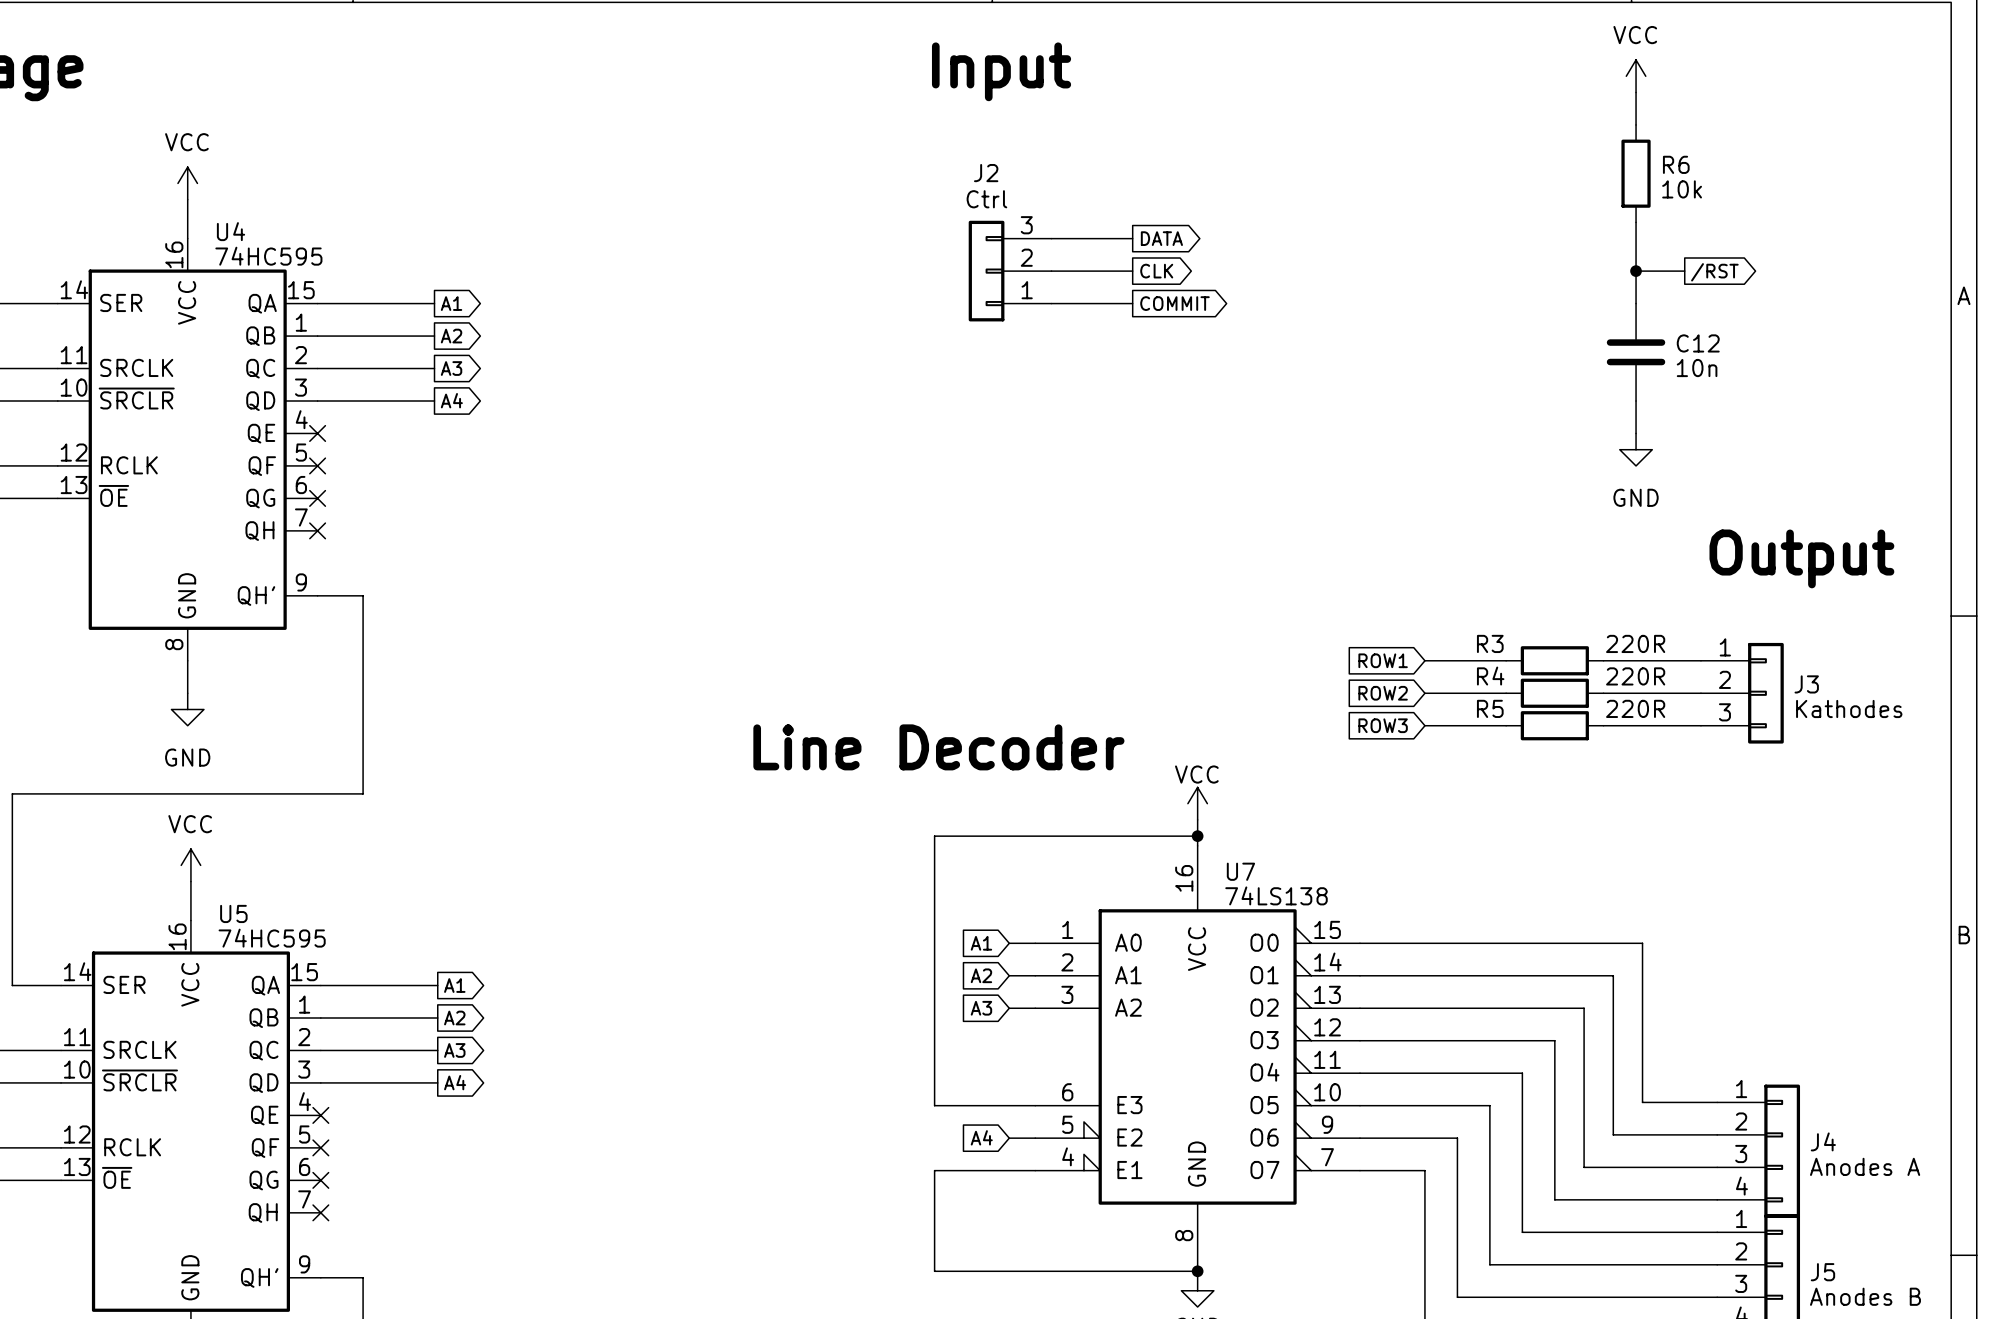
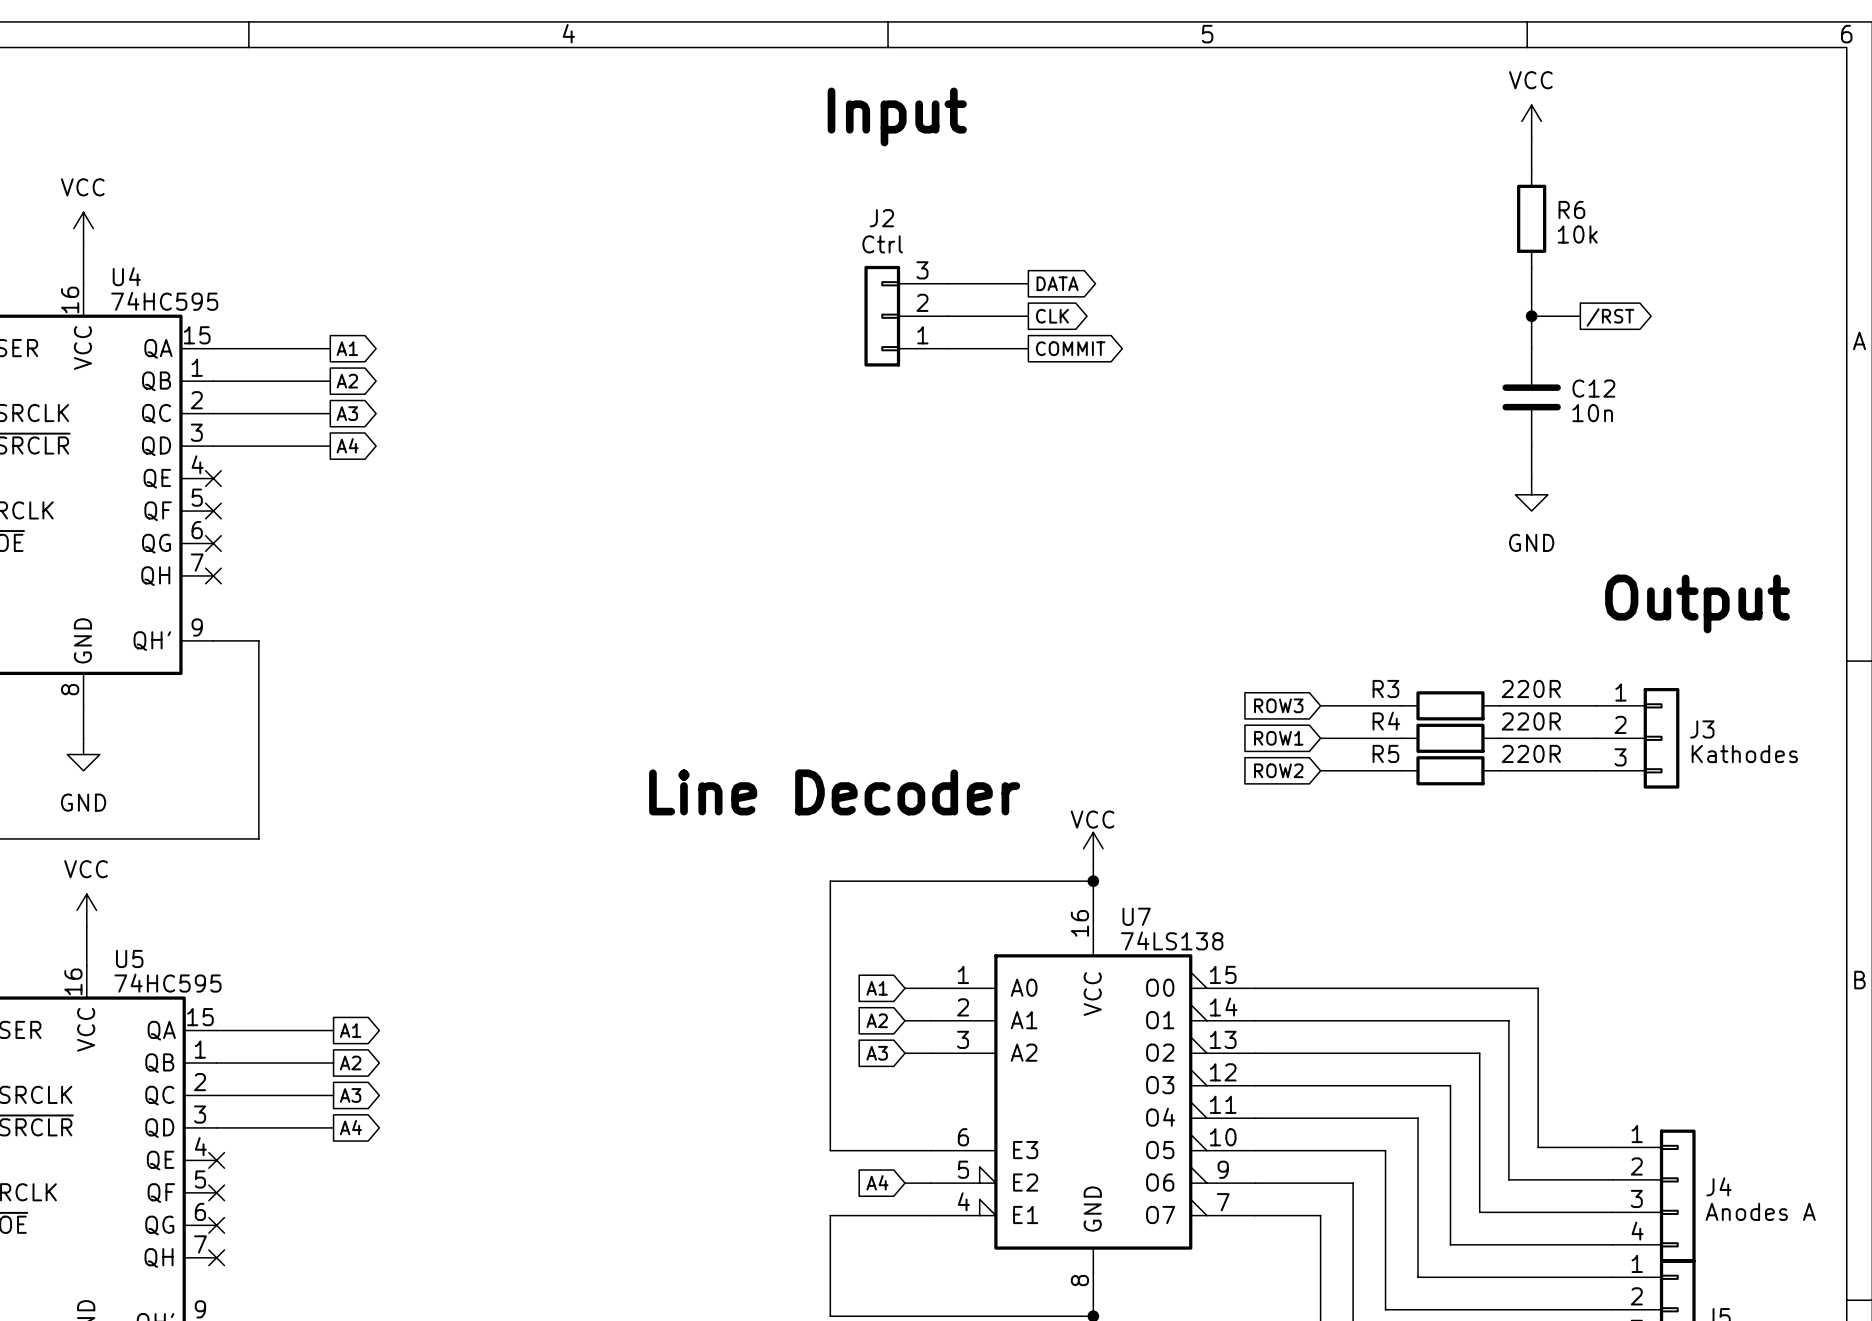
global label: ROW1 (1383, 660) -> ROW3 (1278, 705)
global label: ROW2 (1383, 693) -> ROW1 (1278, 738)
global label: ROW3 (1383, 725) -> ROW2 (1278, 770)

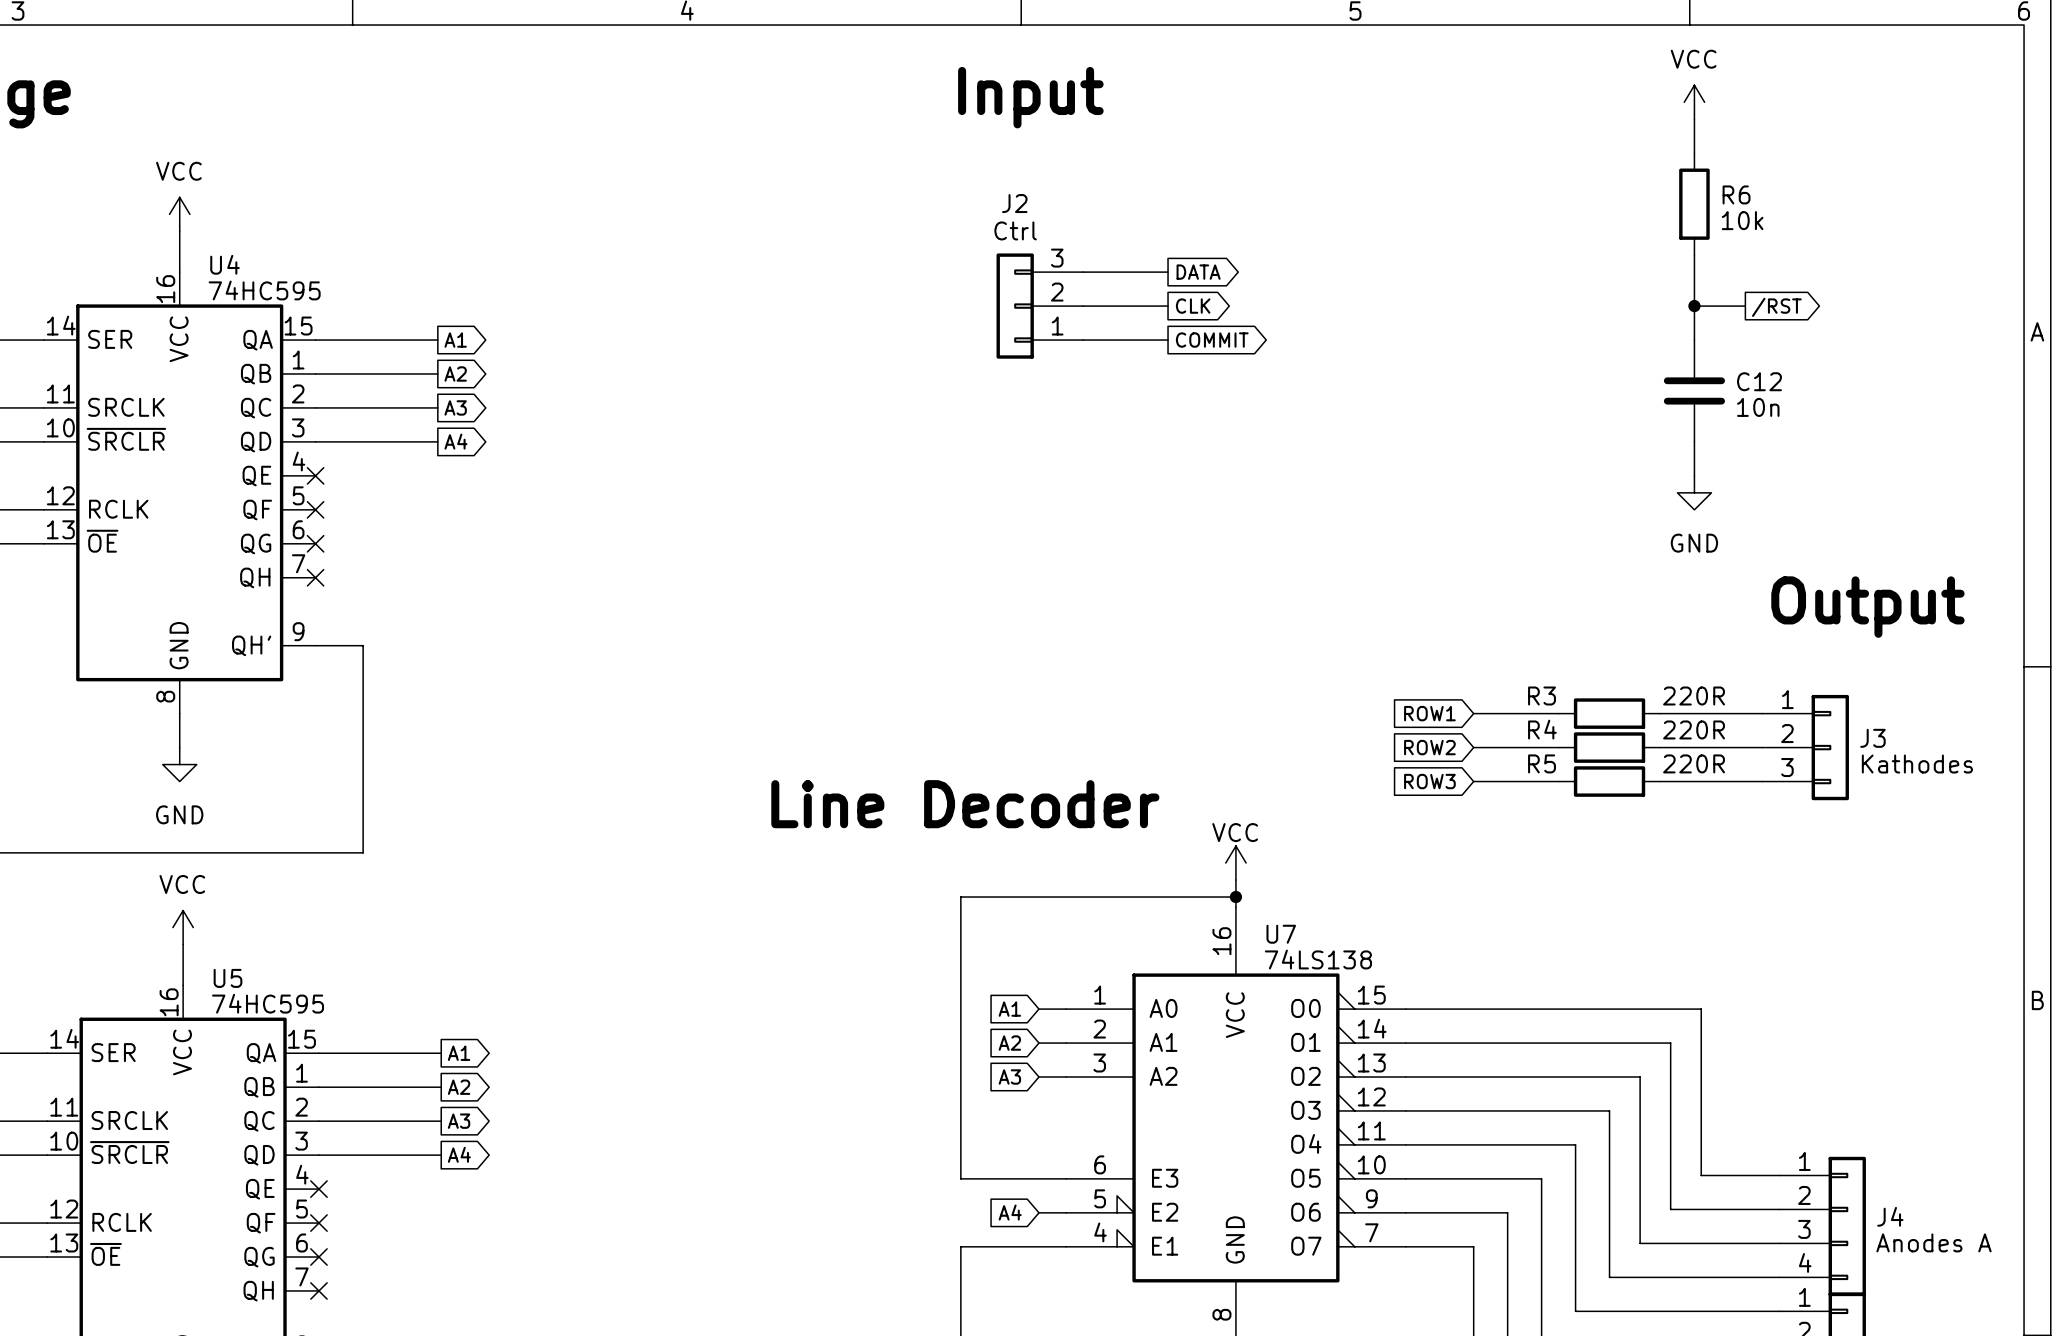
global label: ROW3 (1278, 705) -> ROW1 (1429, 713)
global label: ROW1 (1278, 738) -> ROW2 (1429, 747)
global label: ROW2 (1278, 770) -> ROW3 (1429, 781)

